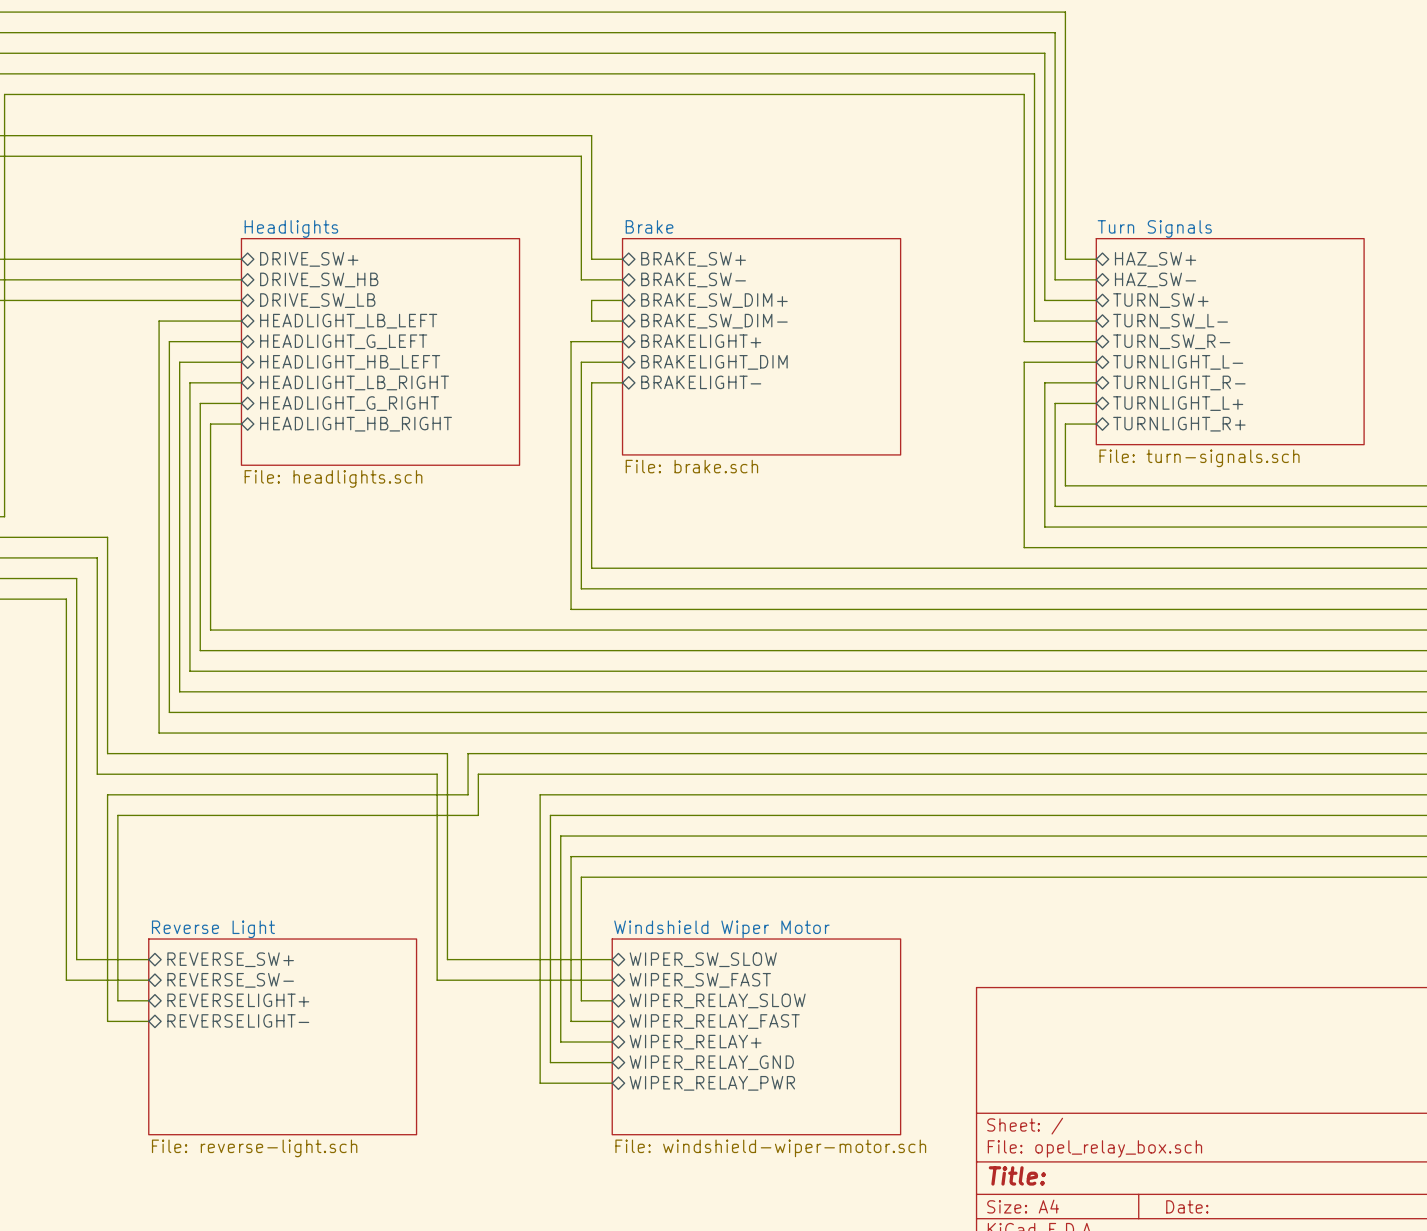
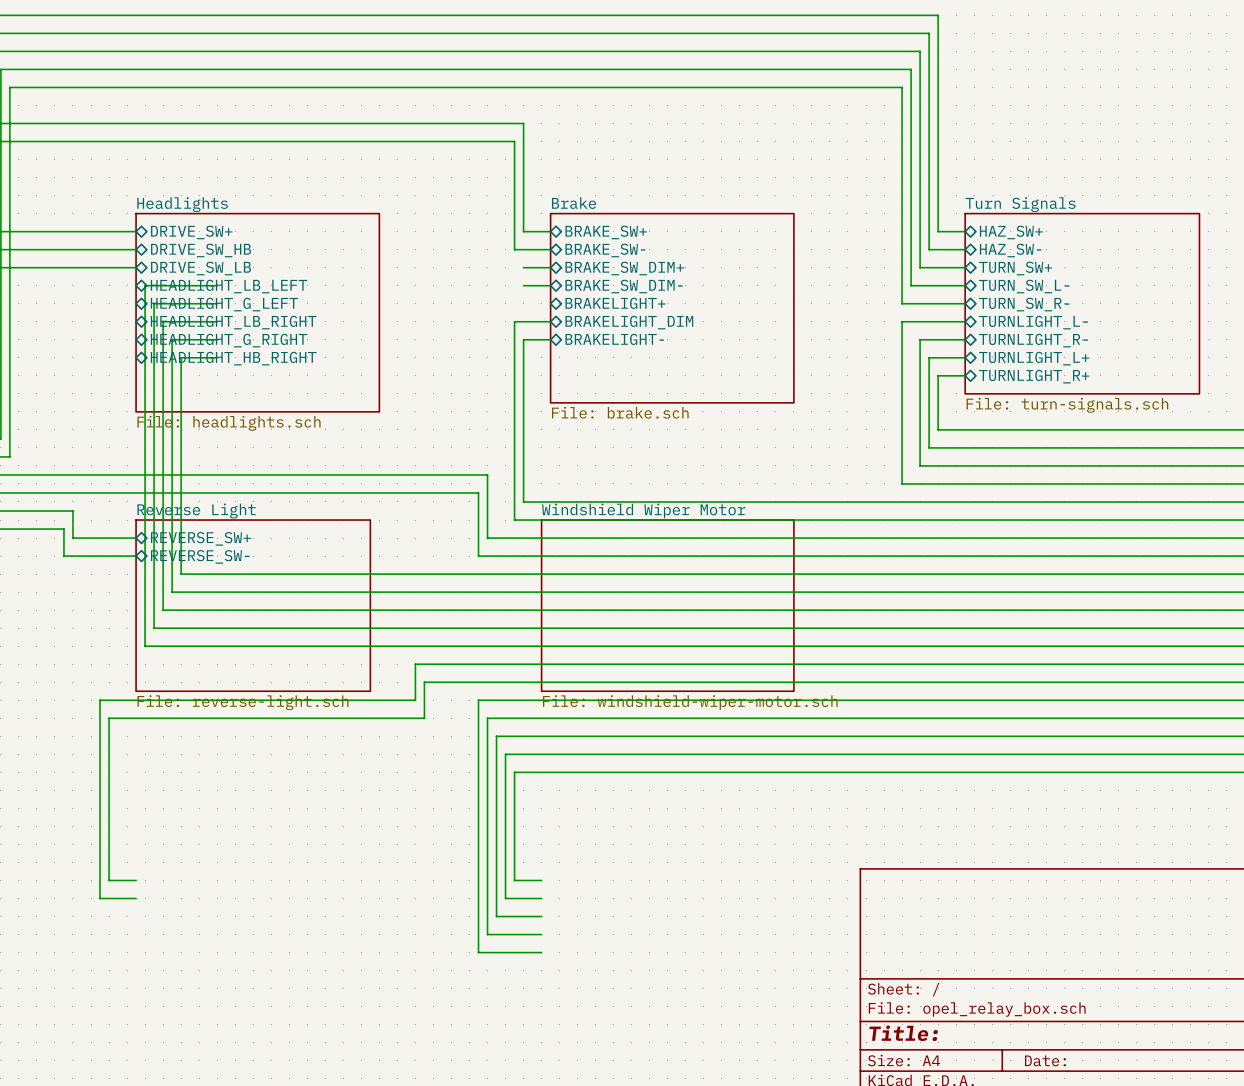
wire: (148, 259) (241, 259) -> none
sheet pin position: DRIVE_SW+ (309, 259) -> DRIVE_SW+ (191, 232)
wire: (148, 279) (241, 279) -> none
sheet pin position: DRIVE_SW_HB (319, 279) -> DRIVE_SW_HB (201, 250)
wire: (148, 300) (241, 300) -> none
sheet pin position: DRIVE_SW_LB (317, 300) -> DRIVE_SW_LB (201, 268)
wire: (591, 300) (591, 321) -> none
sheet pin position: HEADLIGHT_LB_LEFT (348, 321) -> HEADLIGHT_LB_LEFT (229, 286)
sheet pin position: HEADLIGHT_G_LEFT (343, 341) -> HEADLIGHT_G_LEFT (224, 304)
wire: (622, 341) (571, 341) (571, 609) -> none
sheet Headlights position: (380, 351) -> (257, 312)
sheet pin: HEADLIGHT_HB_LEFT (350, 362) -> none
sheet pin position: HEADLIGHT_LB_RIGHT (354, 382) -> HEADLIGHT_LB_RIGHT (233, 322)
sheet pin position: HEADLIGHT_G_RIGHT (349, 403) -> HEADLIGHT_G_RIGHT (229, 340)
wire: (241, 424) (210, 424) (210, 630) (540, 630) -> (91, 492) (478, 492) (478, 556)
sheet pin position: HEADLIGHT_HB_RIGHT (356, 424) -> HEADLIGHT_HB_RIGHT (233, 358)
wire: (107, 537) (107, 753) (447, 753) (447, 959) (612, 959) -> (100, 474) (487, 474) (487, 538) (505, 538)
wire: (97, 557) (97, 774) (437, 774) (437, 980) (612, 980) -> none
wire: (76, 609) (76, 959) (148, 959) -> (72, 538) (136, 538)
sheet pin: none -> REVERSE_SW+ (200, 538)
wire: (66, 630) (66, 980) (148, 980) -> (63, 556) (136, 556)
sheet pin: none -> REVERSE_SW- (200, 556)
sheet Reverse Light: none -> File: reverse-light.sch (253, 605)
sheet Windshield Wiper Motor: none -> File: windshield-wiper-motor.sch (667, 605)
sheet pin: REVERSE_SW+ (230, 959) -> none
sheet pin: WIPER_SW_SLOW (703, 959) -> none
sheet pin: REVERSE_SW- (230, 980) -> none
sheet pin: WIPER_SW_FAST (700, 980) -> none
sheet pin: REVERSELIGHT+ (238, 1000) -> none
sheet pin: WIPER_RELAY_SLOW (717, 1000) -> none
sheet pin: REVERSELIGHT- (238, 1020) -> none
sheet pin: WIPER_RELAY_FAST (714, 1021) -> none
sheet Reverse Light: File: reverse-light.sch (282, 1036) -> none
sheet Windshield Wiper Motor: File: windshield-wiper-motor.sch (756, 1036) -> none
sheet pin: WIPER_RELAY+ (695, 1042) -> none
sheet pin: WIPER_RELAY_GND (711, 1062) -> none
sheet pin: WIPER_RELAY_PWR (712, 1083) -> none

